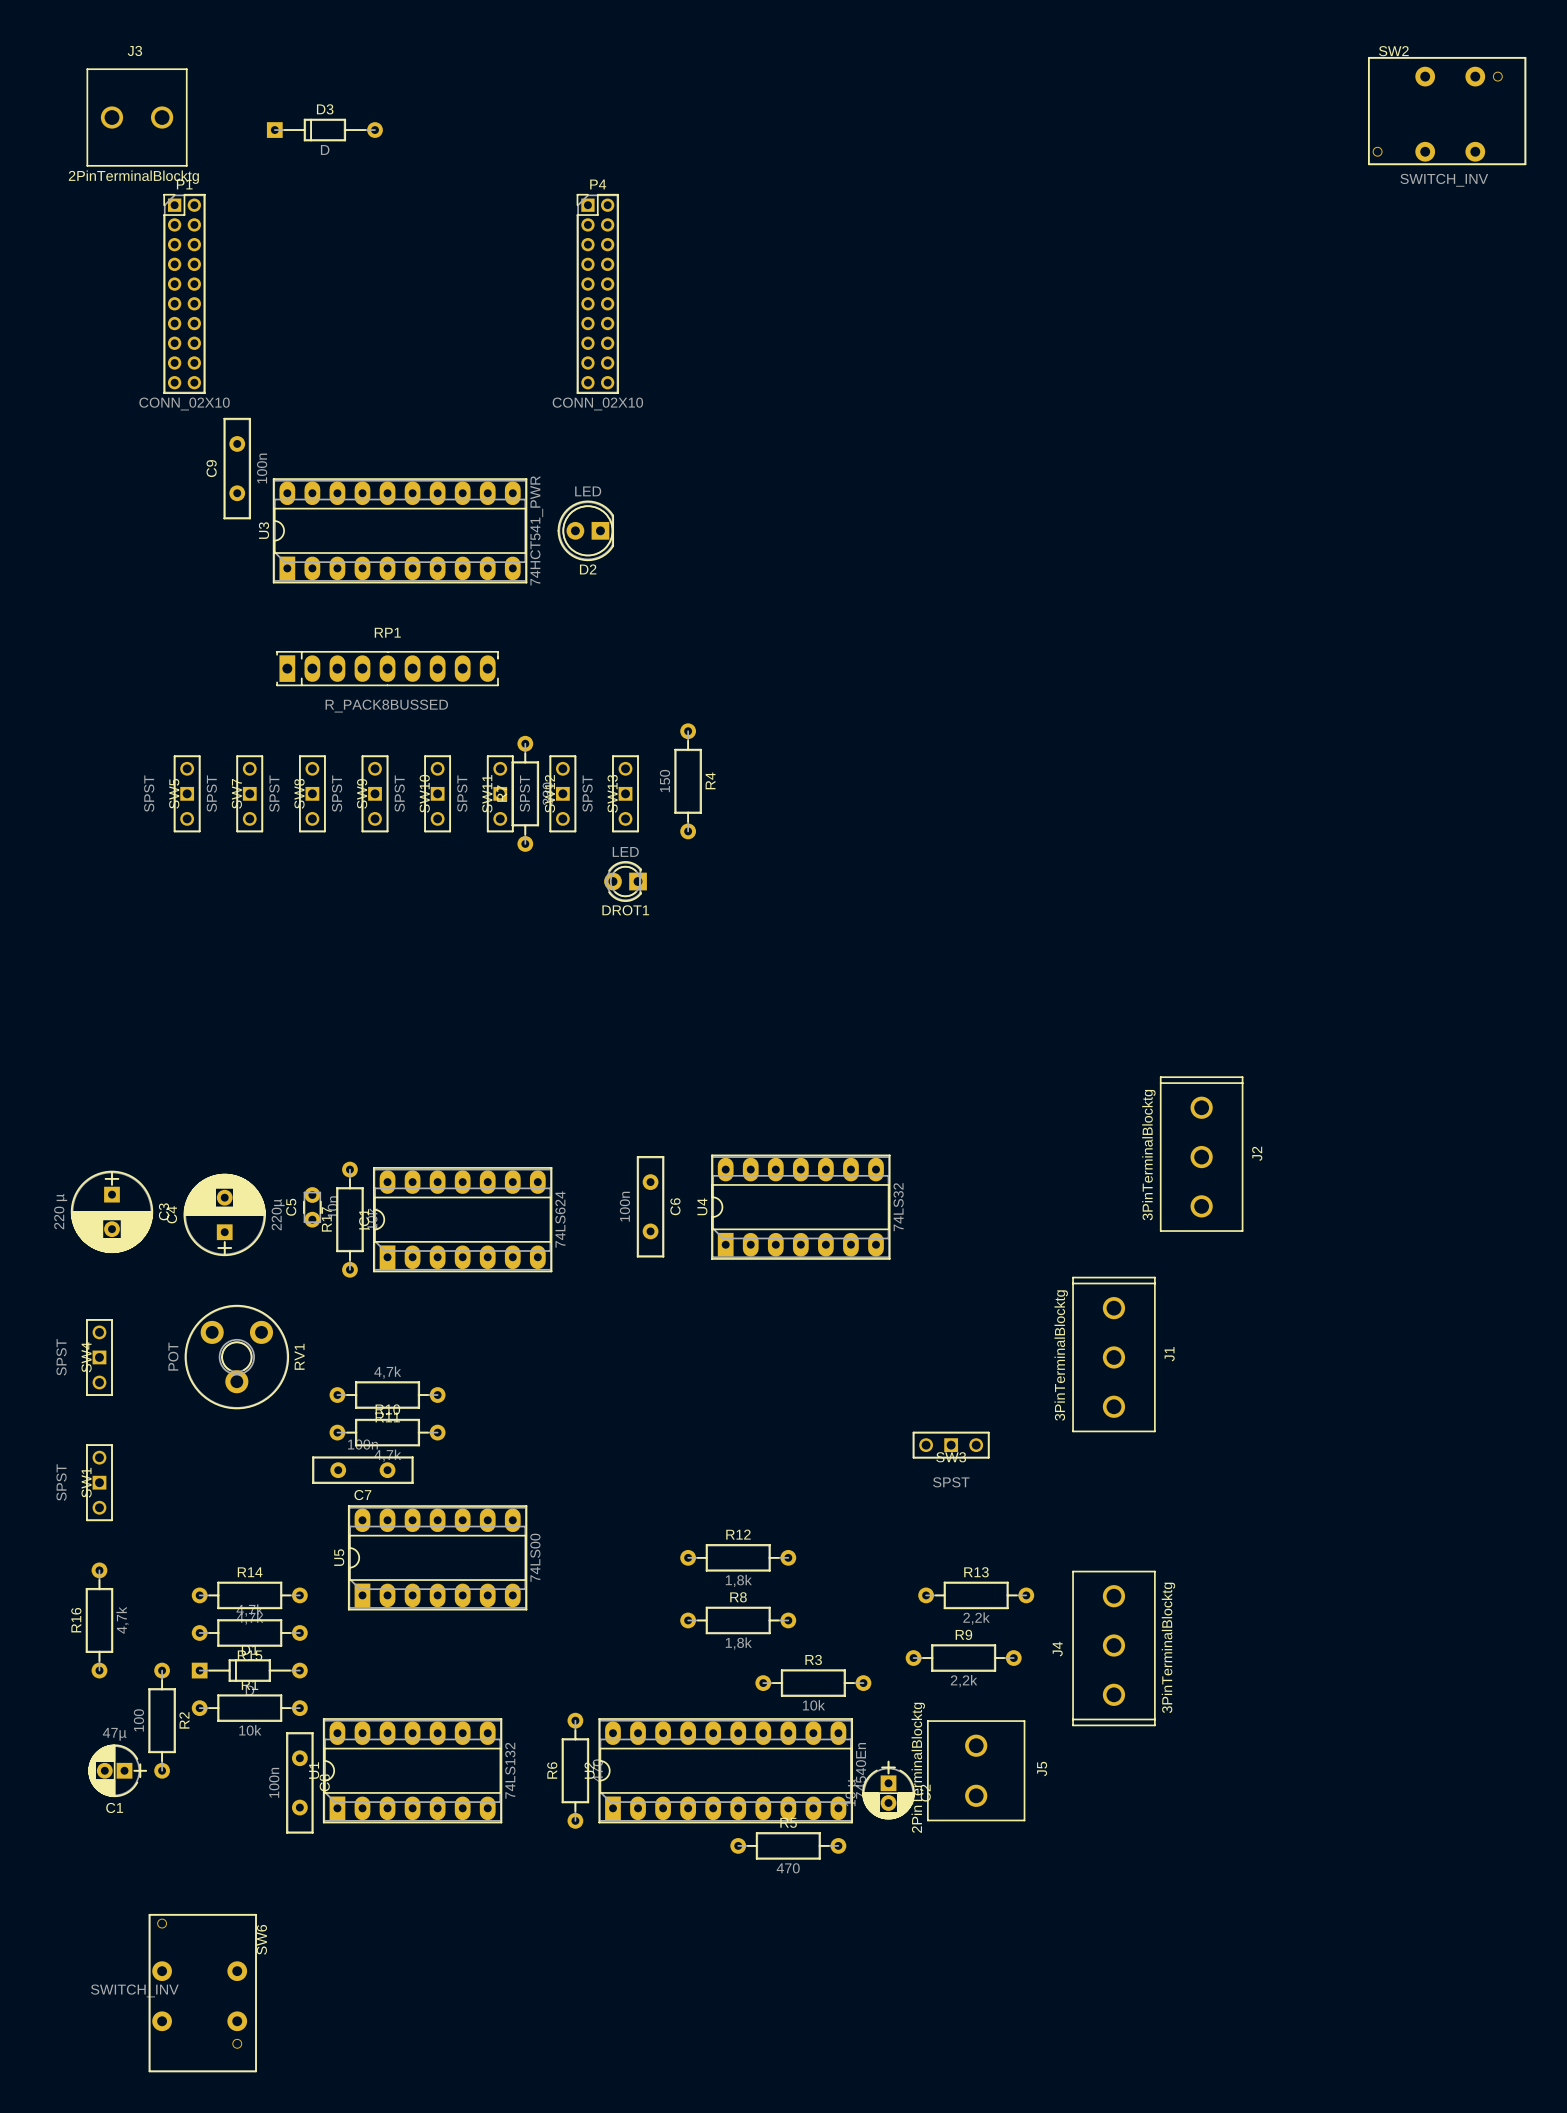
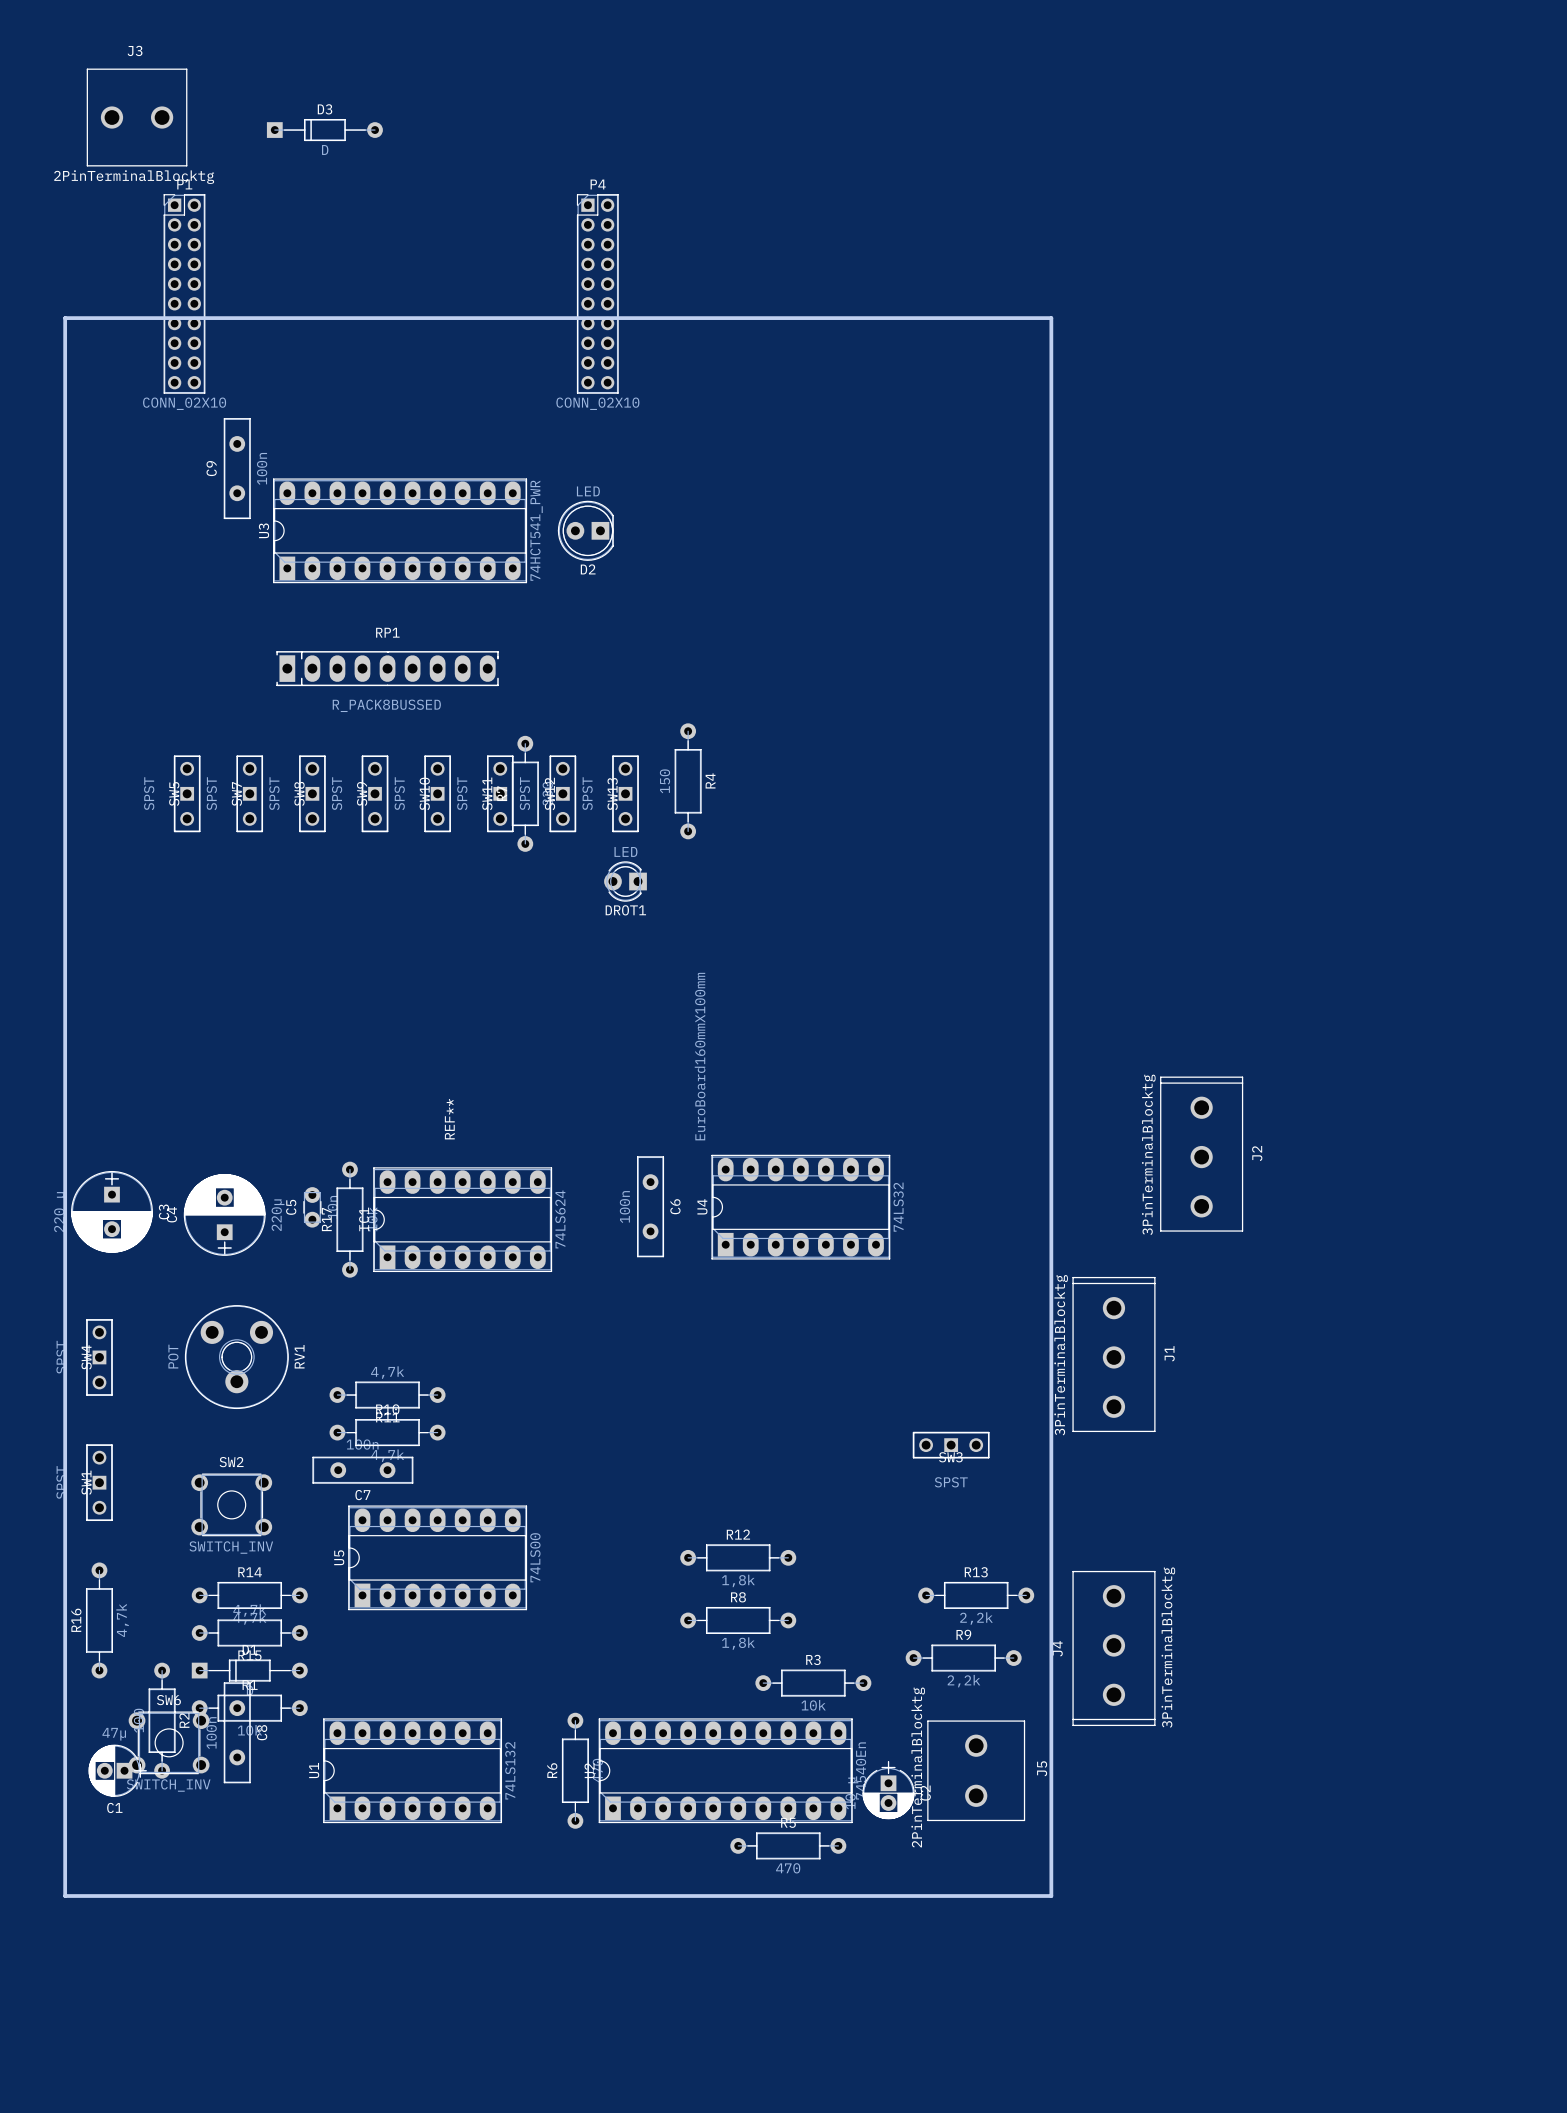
SW2 name position: SW2 (1393, 51) -> SW2 (231, 1462)
SW2 footprint: [1368, 57, 1526, 165] -> [191, 1473, 273, 1537]
SW2 value position: SWITCH_INV (1444, 180) -> SWITCH_INV (231, 1547)
REF**: none -> EuroBoard160mmX100mm (558, 1107)
C8 position: (299, 1782) -> (237, 1732)
SW6 footprint: [148, 1914, 257, 2072] -> [128, 1711, 210, 1775]
SW6 name position: SW6 (261, 1939) -> SW6 (168, 1700)
SW6 value position: SWITCH_INV (134, 1990) -> SWITCH_INV (168, 1785)

